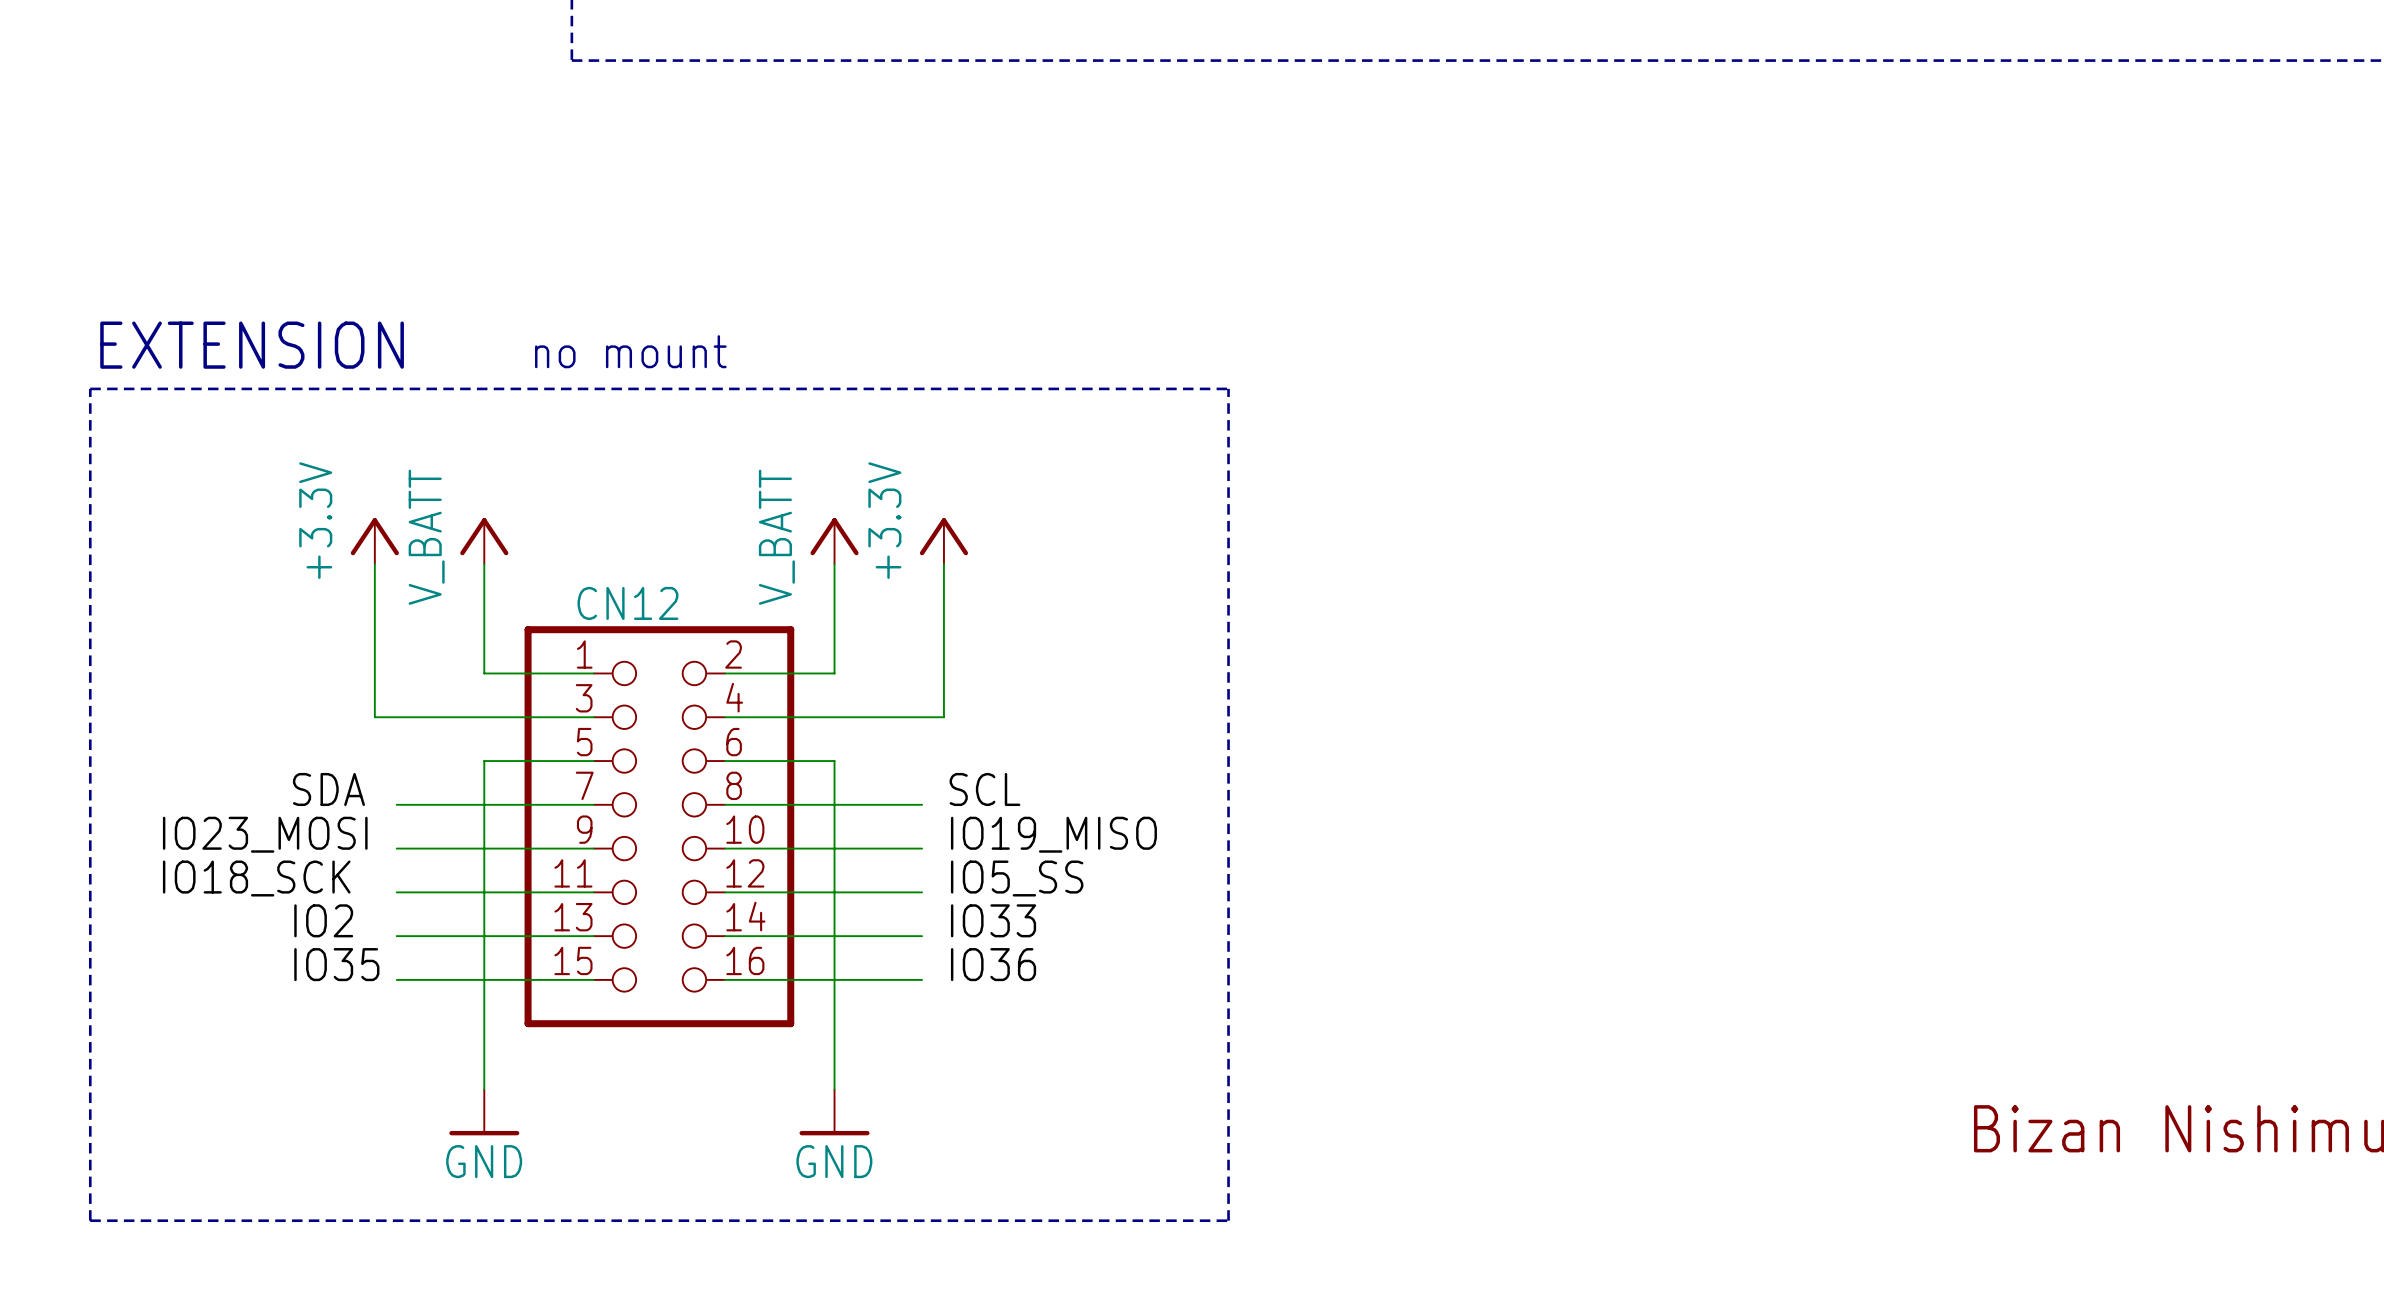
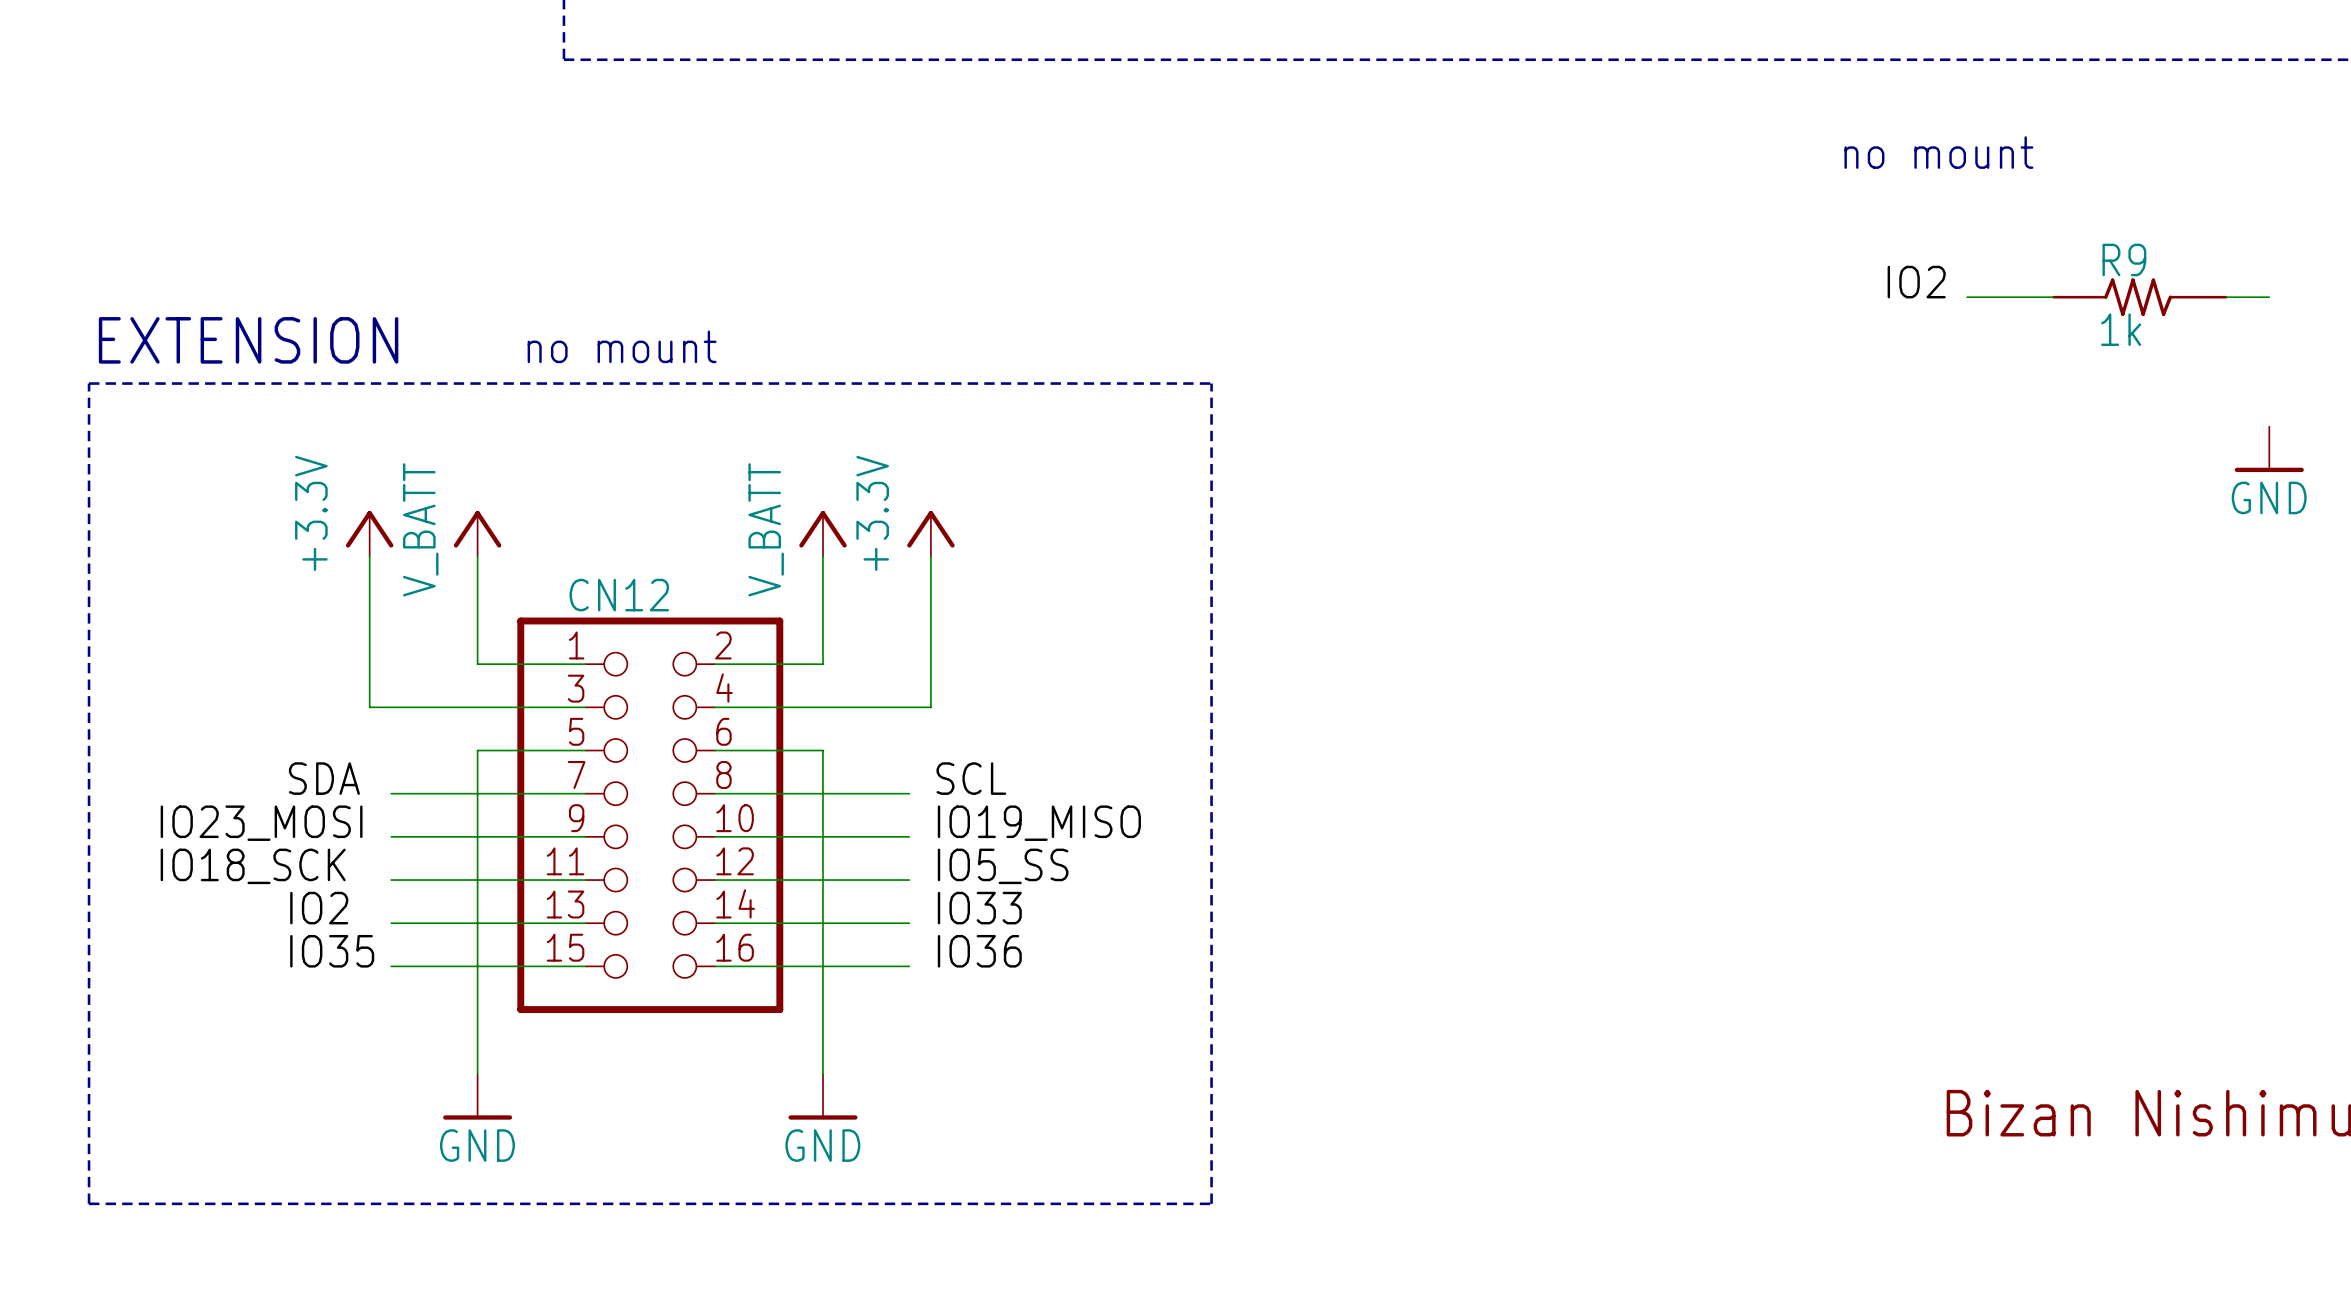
text: none -> no mount (1938, 152)
label: none -> IO2 (1916, 282)
wire: none -> (1967, 297) (2053, 297)
R9: none -> 1k (2139, 297)
wire: none -> (2226, 297) (2269, 297)
power symbol: none -> GND (2269, 449)

